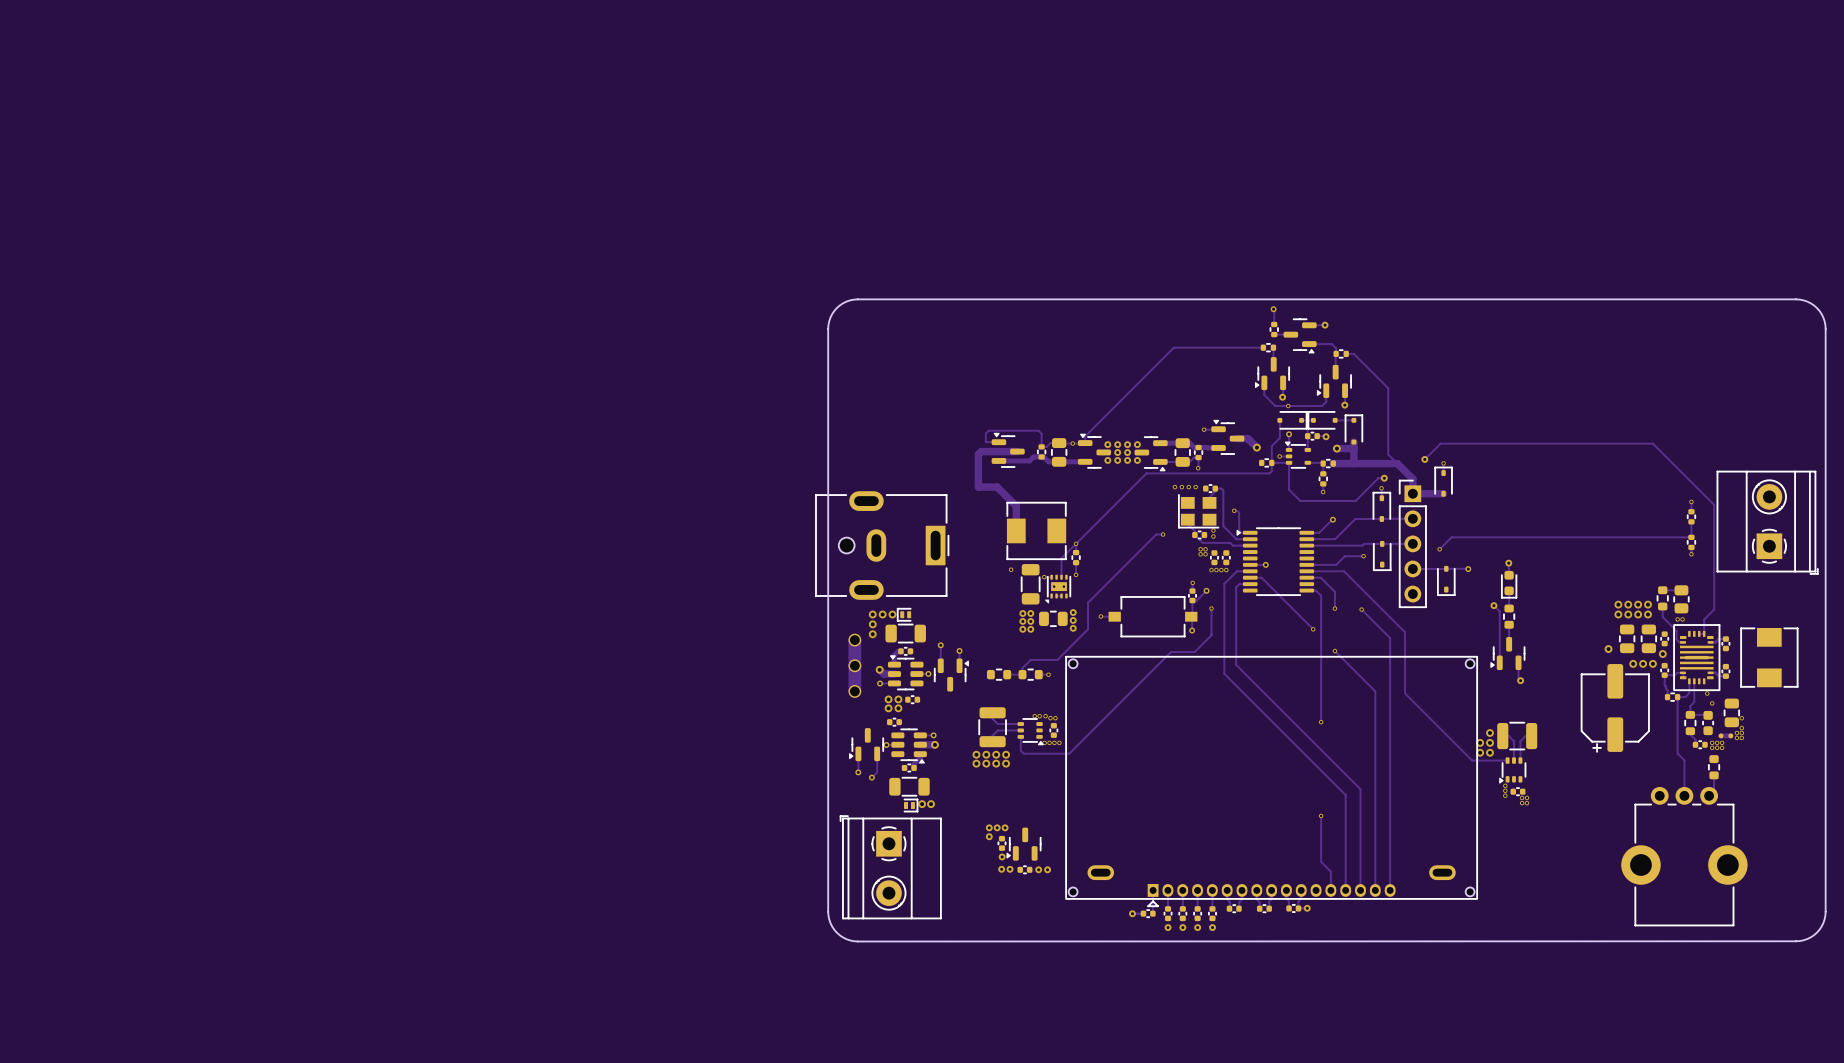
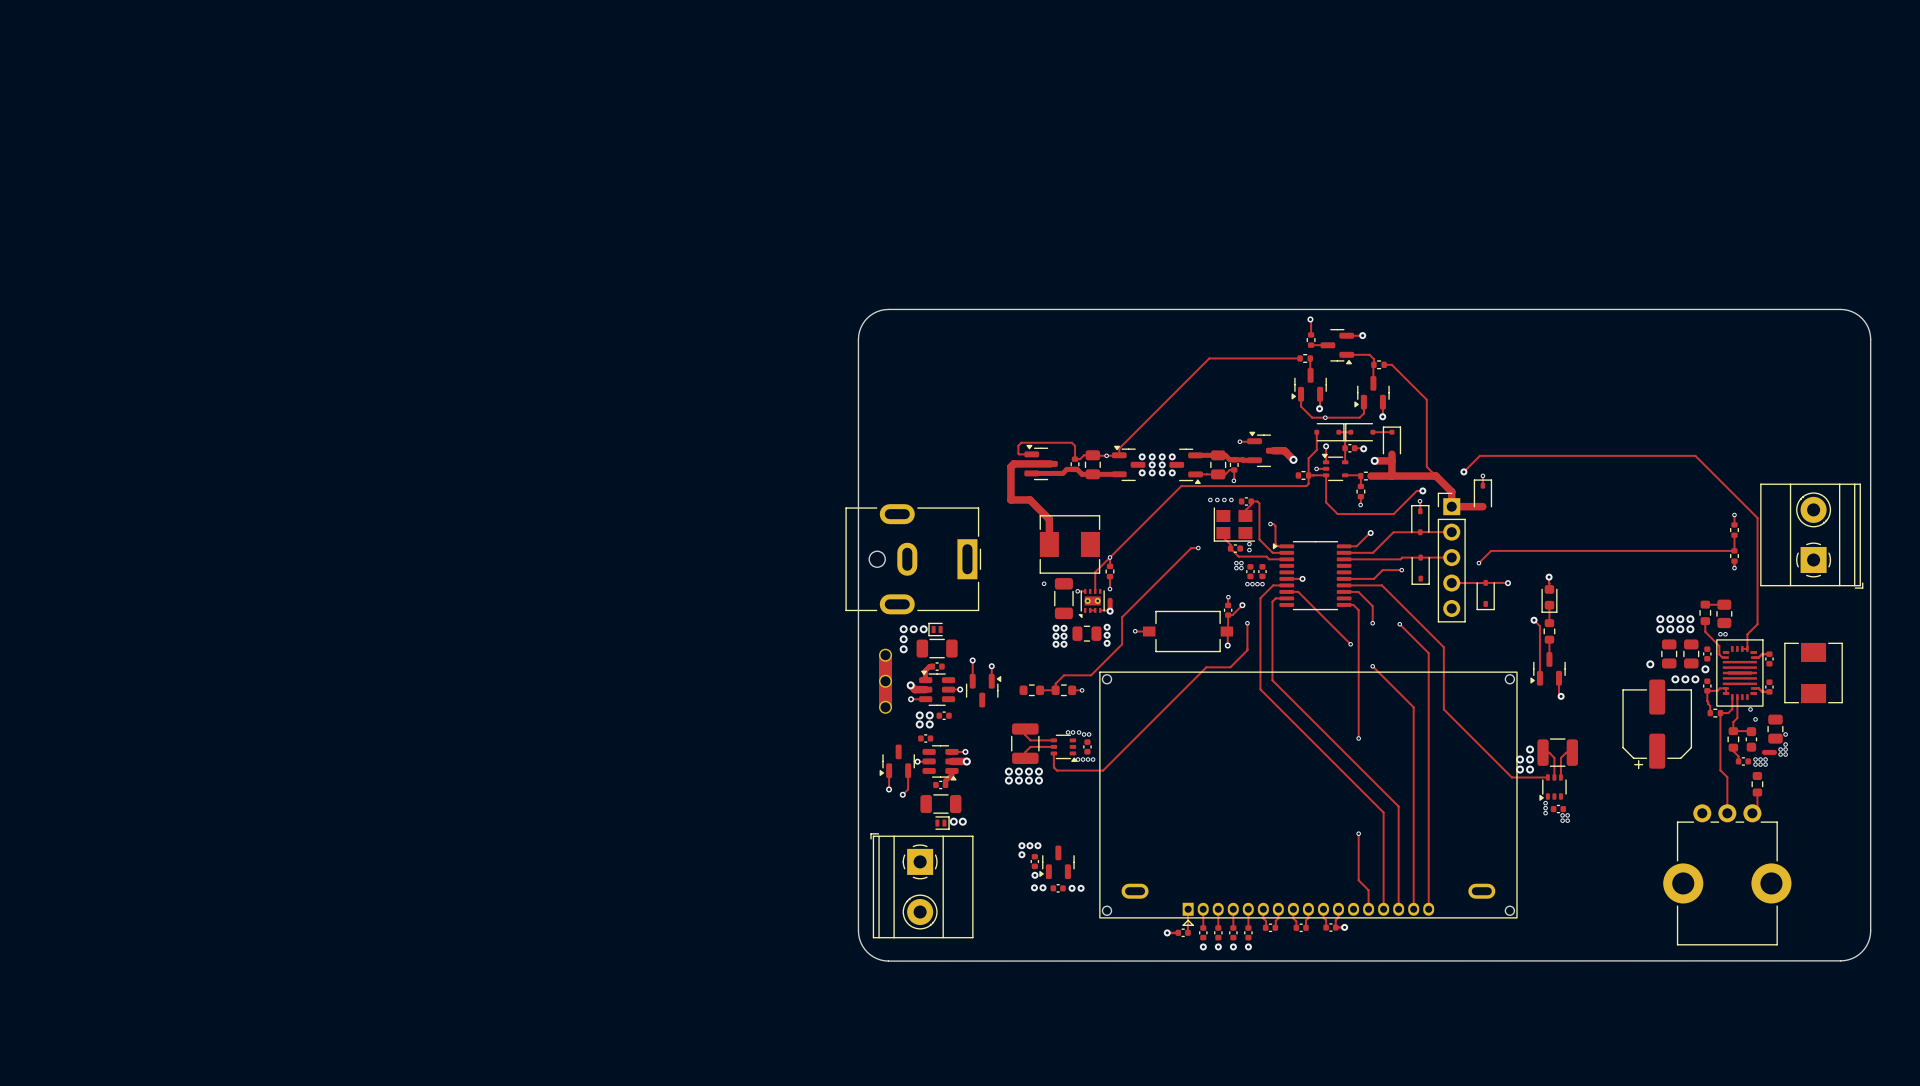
part: none -> (1110, 605)
track: none -> (1100, 610) (1110, 611)
via: none -> (1110, 611)

